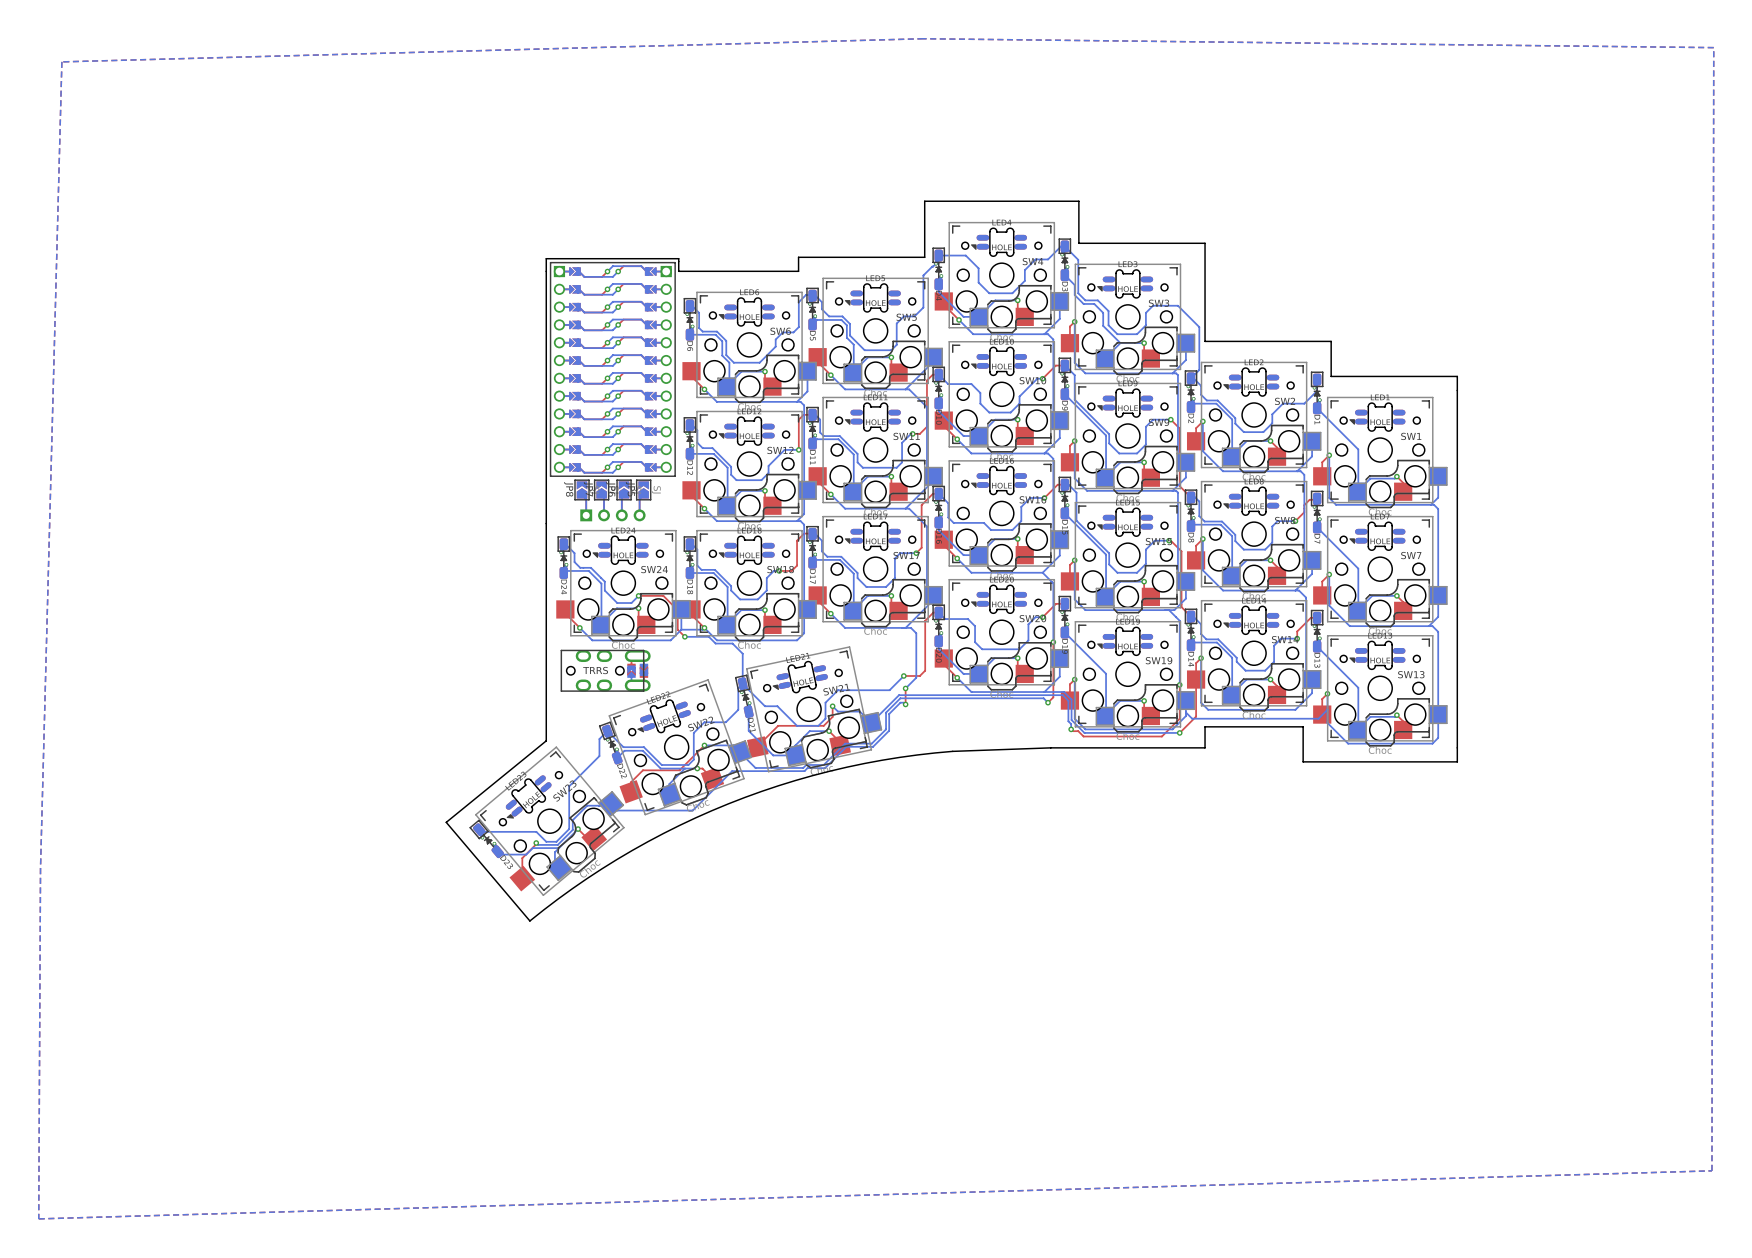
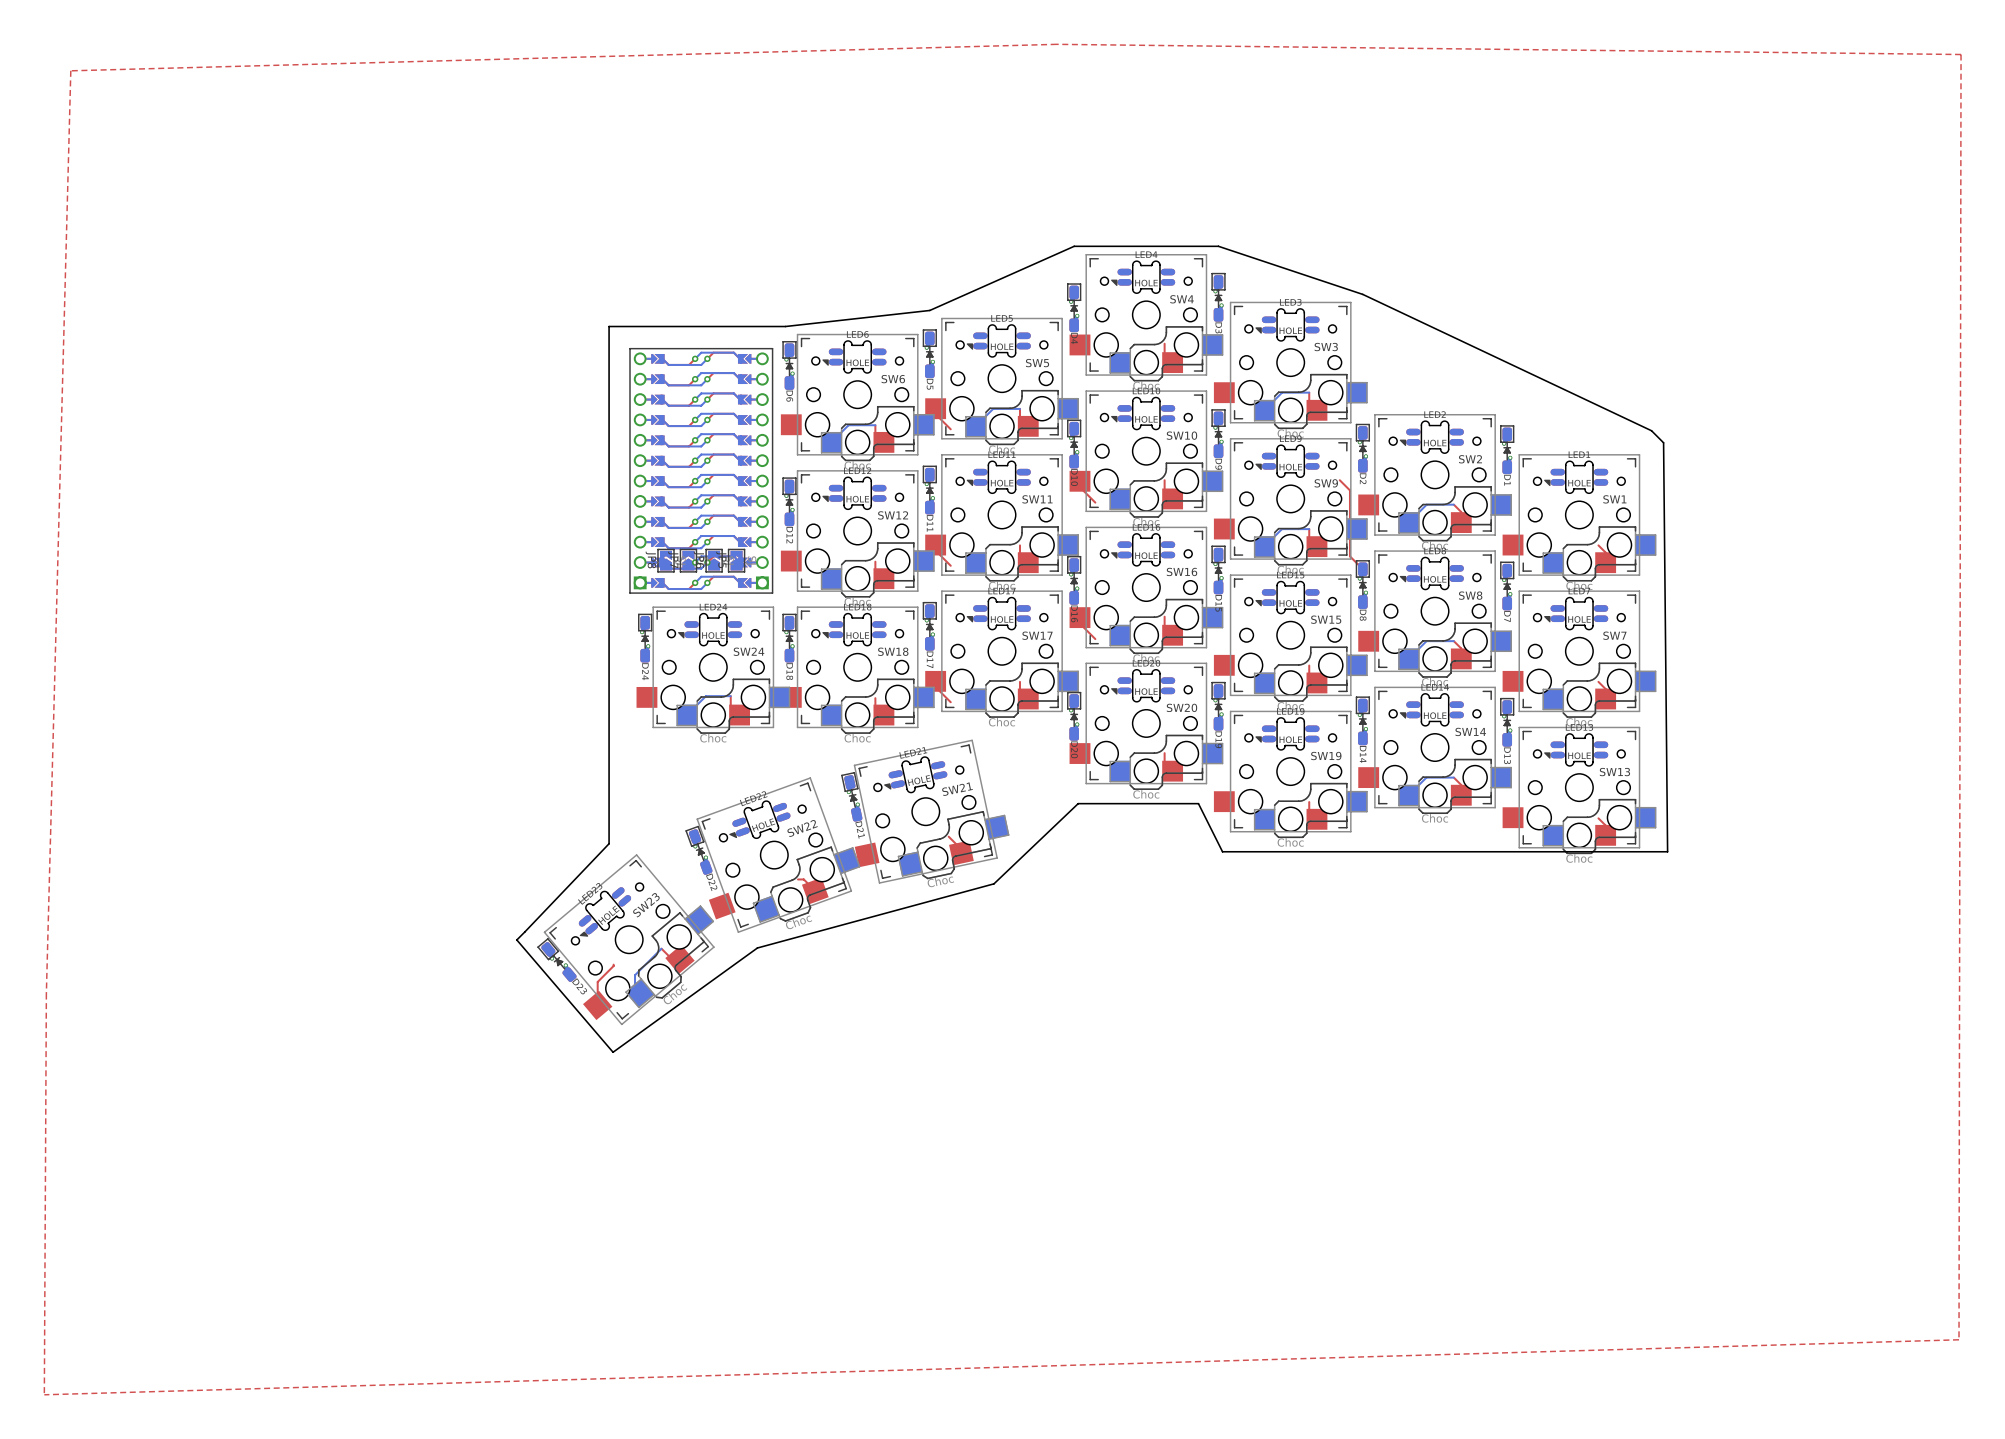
bottom zone outline: (923, 38) (1713, 47) (1711, 1170) (38, 1218) (40, 868) (61, 61) (923, 38) -> none
board edge: (1078, 201) (924, 201) (924, 257) (798, 257) (798, 271) (678, 271) (678, 258) (546, 258) (546, 740) (446, 822) (529, 920) (572, 888) (617, 859) (695, 817) (744, 797) (795, 780) (882, 760) (952, 751) (1050, 747) (1205, 747) (1205, 726) (1303, 726) (1303, 761) (1457, 761) (1457, 376) (1331, 376) (1331, 341) (1205, 341) (1205, 243) (1078, 243) (1078, 201) -> (1218, 246) (1362, 294) (1651, 430) (1663, 442) (1667, 851) (1222, 851) (1198, 803) (1078, 803) (993, 883) (757, 948) (613, 1052) (516, 939) (609, 843) (609, 326) (785, 326) (929, 310) (1074, 246) (1218, 246)
bottom track: (938, 255) (965, 255) (978, 268) (978, 282) (989, 293) (1012, 293) (1024, 280) (1024, 270) (1035, 259) (1048, 259) (1061, 246) (1064, 246) (1078, 259) (1078, 293) (1085, 300) (1097, 300) (1108, 311) (1108, 325) (1117, 334) (1137, 334) (1145, 325) (1145, 312) (1153, 305) (1177, 305) (1199, 327) (1199, 370) (1191, 378) (1193, 378) (1201, 385) (1201, 394) (1206, 400) (1217, 400) (1235, 418) (1235, 423) (1243, 432) (1263, 432) (1272, 423) (1272, 414) (1282, 403) (1304, 403) (1317, 390) (1317, 379) -> none
bottom track: (936, 263) (923, 275) (923, 307) (914, 316) (903, 316) (896, 323) (896, 344) (891, 350) (864, 350) (850, 335) (850, 324) (842, 316) (829, 316) (821, 309) (821, 302) (815, 295) (805, 295) (798, 302) (798, 327) (793, 332) (782, 332) (775, 339) (775, 346) (759, 362) (733, 362) (726, 355) (726, 340) (716, 331) (702, 331) (699, 328) (699, 312) (689, 306) -> none
bottom track: (1064, 275) (1074, 285) (1074, 295) (1083, 303) (1094, 303) (1103, 312) (1103, 325) (1120, 343) -> none
bottom track: (938, 284) (938, 292) (963, 316) (978, 316) (995, 300) (1017, 300) -> none
via: (1017, 300) -> none
top track: (943, 301) (943, 304) (959, 319) -> none
bottom track: (1059, 301) (1059, 318) (1044, 334) -> none
bottom track: (959, 319) (973, 334) (1048, 334) (1053, 339) (1053, 414) (1059, 420) (1059, 438) (1044, 453) -> none
via: (959, 319) -> none
bottom track: (1074, 321) (1074, 362) (1085, 373) (1176, 373) (1177, 375) (1177, 454) (1185, 462) (1185, 477) (1172, 490) -> none
top track: (1074, 321) (1069, 326) (1069, 343) -> none
via: (1074, 321) -> none
bottom track: (812, 324) (817, 319) (841, 319) (846, 325) (846, 337) (853, 344) (853, 371) -> none
bottom track: (689, 334) (715, 334) (722, 341) (722, 355) (729, 362) (729, 383) -> none
via: (1144, 343) -> none
bottom track: (1185, 343) (1185, 360) (1172, 373) -> none
via: (891, 357) -> none
bottom track: (933, 357) (933, 361) (905, 389) -> none
bottom track: (1064, 365) (1074, 375) (1074, 399) (1109, 434) (1109, 443) (1119, 453) (1137, 453) (1145, 444) (1145, 426) (1153, 419) (1170, 419) -> none
top track: (1064, 365) (1055, 365) (1042, 378) -> none
part rotation: 0° (612, 369) -> 180° (701, 470)
top track: (691, 371) (691, 376) (704, 389) -> none
via: (764, 371) -> none
bottom track: (807, 371) (807, 391) (797, 401) -> none
bottom track: (938, 374) (948, 384) (971, 384) (980, 392) (980, 403) (989, 412) (1010, 412) (1019, 403) (1019, 396) (1037, 378) (1042, 378) -> none
top track: (938, 374) (932, 374) (926, 380) (926, 426) (919, 433) (912, 433) -> none
bottom track: (830, 375) (845, 389) (909, 389) (926, 407) (926, 469) (933, 476) (933, 480) (905, 508) -> none
via: (830, 375) -> none
via: (1042, 378) -> none
bottom track: (704, 389) (716, 401) (800, 401) (804, 405) (804, 486) -> none
via: (704, 389) -> none
bottom track: (1064, 394) (1106, 435) (1106, 476) -> none
bottom track: (938, 403) (938, 411) (963, 436) (978, 436) (995, 419) (1017, 419) -> none
bottom track: (1191, 407) (1194, 403) (1216, 403) (1232, 419) (1232, 455) -> none
bottom track: (1317, 408) (1358, 449) (1358, 490) -> none
bottom track: (812, 414) (820, 419) (820, 432) (823, 436) (839, 436) (857, 453) (857, 462) (862, 467) (896, 467) (902, 462) (902, 442) (912, 433) -> none
top track: (812, 414) (803, 414) (798, 419) (798, 449) -> none
via: (1017, 419) -> none
via: (1170, 419) -> none
bottom track: (1202, 421) (1202, 451) (1222, 471) (1300, 471) (1304, 474) (1304, 552) (1312, 560) (1312, 573) (1295, 590) -> none
top track: (1202, 421) (1196, 428) (1196, 441) -> none
via: (1202, 421) -> none
bottom track: (689, 425) (697, 430) (697, 442) (702, 448) (712, 448) (731, 466) (731, 474) (736, 480) (761, 480) (768, 473) (768, 465) (784, 449) (798, 449) -> none
via: (912, 433) -> none
bottom track: (957, 439) (971, 453) (1048, 453) (1053, 458) (1053, 533) (1059, 539) (1059, 555) (1042, 572) -> none
via: (957, 439) -> none
bottom track: (1074, 441) (1074, 478) (1087, 490) (1176, 490) (1177, 492) (1177, 573) (1185, 581) (1185, 598) (1174, 610) (1085, 610) (1074, 599) (1074, 560) -> none
top track: (1074, 441) (1069, 445) (1069, 462) -> none
via: (1074, 441) -> none
via: (1270, 441) -> none
bottom track: (1312, 441) (1312, 456) (1297, 471) -> none
bottom track: (812, 443) (816, 439) (838, 439) (853, 454) (853, 490) -> none
via: (798, 449) -> none
bottom track: (689, 453) (713, 453) (727, 467) (727, 504) -> none
bottom track: (1329, 455) (1329, 497) (1336, 504) (1434, 504) (1438, 509) (1438, 616) (1428, 626) -> none
top track: (1329, 455) (1322, 462) (1322, 476) -> none
via: (1329, 455) -> none
via: (1144, 462) -> none
bottom track: (891, 476) (867, 476) (852, 491) -> none
via: (891, 476) -> none
bottom track: (1396, 476) (1394, 478) (1370, 478) (1357, 491) -> none
via: (1396, 476) -> none
bottom track: (1438, 476) (1438, 497) (1430, 504) -> none
bottom track: (800, 483) (807, 490) (804, 493) (804, 514) (797, 521) -> none
bottom track: (1064, 484) (1068, 484) (1076, 492) (1076, 520) (1109, 553) (1109, 564) (1117, 572) (1137, 572) (1145, 563) (1145, 549) (1154, 540) (1169, 540) -> none
top track: (1064, 484) (1057, 484) (1044, 497) -> none
top track: (691, 490) (691, 495) (704, 508) -> none
bottom track: (764, 490) (741, 490) (726, 505) -> none
via: (764, 490) -> none
bottom track: (938, 493) (948, 503) (948, 517) (953, 522) (983, 522) (991, 530) (1012, 530) (1021, 521) (1021, 506) (1030, 497) (1044, 497) -> none
top track: (938, 493) (932, 493) (921, 505) (921, 547) (916, 553) -> none
bottom track: (830, 494) (845, 508) (909, 508) (926, 526) (926, 588) (933, 595) (933, 599) (905, 627) -> none
via: (830, 494) -> none
bottom track: (582, 495) (586, 499) (586, 515) -> none
bottom track: (601, 495) (604, 497) (604, 515) -> none
bottom track: (624, 495) (621, 497) (621, 515) -> none
bottom track: (643, 495) (639, 499) (639, 515) -> none
via: (1044, 497) -> none
bottom track: (1191, 497) (1195, 497) (1199, 501) (1199, 516) (1204, 521) (1221, 521) (1235, 534) (1235, 541) (1243, 549) (1265, 549) (1272, 542) (1272, 526) (1277, 521) (1295, 521) -> none
top track: (1317, 498) (1309, 499) (1304, 505) (1304, 512) (1295, 521) -> none
bottom track: (704, 508) (716, 521) (800, 521) (804, 524) (804, 606) -> none
via: (704, 508) -> none
bottom track: (1064, 513) (1106, 554) (1106, 595) -> none
part: (612, 515) -> none
via: (1295, 521) -> none
bottom track: (938, 522) (938, 530) (963, 555) (978, 555) (995, 538) (1017, 538) -> none
bottom track: (1191, 526) (1220, 524) (1232, 536) (1232, 574) -> none
bottom track: (1317, 527) (1358, 568) (1358, 609) -> none
bottom track: (812, 533) (815, 533) (821, 540) (821, 551) (827, 556) (841, 556) (857, 573) (857, 578) (866, 586) (886, 586) (894, 578) (894, 558) (900, 553) (916, 553) -> none
top track: (812, 533) (804, 533) (797, 540) (797, 565) (791, 570) (779, 570) -> none
via: (1017, 538) -> none
bottom track: (1202, 538) (1202, 570) (1223, 590) (1299, 590) (1306, 597) (1306, 673) (1312, 679) (1312, 693) (1295, 709) (1208, 709) (1201, 702) (1201, 658) -> none
top track: (1202, 538) (1196, 545) (1196, 560) -> none
via: (1202, 538) -> none
top track: (1169, 540) (1181, 551) (1181, 607) (1191, 616) -> none
via: (1169, 540) -> none
bottom track: (563, 544) (574, 553) (574, 562) (580, 567) (590, 567) (604, 581) (604, 590) (617, 603) (631, 603) (638, 595) -> none
bottom track: (689, 544) (697, 549) (697, 565) (701, 569) (714, 569) (731, 586) (731, 590) (740, 599) (757, 599) (766, 590) (766, 578) (773, 570) (779, 570) -> none
via: (916, 553) -> none
bottom track: (957, 558) (971, 572) (1042, 572) -> none
via: (957, 558) -> none
top track: (1074, 560) (1069, 565) (1069, 581) -> none
via: (1074, 560) -> none
via: (1270, 560) -> none
bottom track: (812, 562) (815, 559) (840, 559) (853, 573) (853, 609) -> none
via: (779, 570) -> none
bottom track: (1042, 572) (1053, 583) (1053, 642) -> none
bottom track: (563, 573) (565, 570) (588, 570) (601, 583) (601, 623) -> none
bottom track: (689, 573) (713, 573) (727, 586) (727, 623) -> none
bottom track: (1329, 574) (1329, 605) (1349, 626) (1432, 626) (1438, 631) (1438, 737) (1432, 743) (1348, 743) (1327, 722) (1327, 693) -> none
top track: (1329, 574) (1322, 581) (1322, 595) -> none
via: (1329, 574) -> none
bottom track: (1144, 581) (1120, 581) (1104, 596) -> none
via: (1144, 581) -> none
top track: (638, 595) (663, 595) (677, 610) (677, 629) (684, 636) -> none
via: (638, 595) -> none
bottom track: (891, 595) (867, 595) (852, 610) -> none
via: (891, 595) -> none
bottom track: (1396, 595) (1372, 595) (1357, 610) -> none
via: (1396, 595) -> none
bottom track: (800, 602) (807, 609) (804, 612) (804, 633) (797, 640) (716, 640) (704, 627) (702, 629) (681, 629) -> none
top track: (1064, 603) (1056, 603) (1042, 617) -> none
via: (638, 608) -> none
top track: (565, 609) (565, 613) (579, 627) -> none
bottom track: (681, 609) (681, 629) -> none
top track: (691, 609) (691, 614) (704, 627) -> none
bottom track: (764, 610) (741, 610) (726, 624) -> none
via: (764, 610) -> none
bottom track: (1169, 610) (1179, 620) (1179, 684) -> none
bottom track: (938, 612) (945, 619) (967, 619) (975, 626) (975, 642) (982, 649) (1019, 649) (1028, 640) (1028, 624) (1035, 617) (1042, 617) -> none
top track: (938, 612) (933, 612) (925, 620) (925, 670) (919, 675) (903, 675) -> none
bottom track: (830, 613) (845, 627) (910, 627) (916, 633) (916, 677) (905, 688) -> none
via: (830, 613) -> none
bottom track: (1191, 616) (1201, 624) (1201, 634) (1206, 639) (1218, 639) (1236, 657) (1236, 661) (1245, 670) (1265, 670) (1274, 661) (1274, 645) (1281, 638) (1297, 638) -> none
via: (1042, 617) -> none
top track: (1317, 617) (1310, 617) (1297, 631) (1297, 638) -> none
bottom track: (579, 627) (592, 640) (670, 640) (681, 629) -> none
via: (579, 627) -> none
via: (704, 627) -> none
bottom track: (1064, 632) (1106, 673) (1106, 714) -> none
bottom track: (684, 636) (708, 636) (715, 643) (732, 643) (742, 653) (742, 683) (764, 706) (777, 706) (797, 725) (818, 725) (825, 718) (825, 702) (837, 690) (889, 690) (903, 675) -> none
via: (684, 636) -> none
via: (1297, 638) -> none
bottom track: (938, 641) (938, 649) (963, 673) (978, 673) (994, 658) (1017, 658) -> none
top track: (1053, 642) (1053, 697) (1048, 702) -> none
via: (1053, 642) -> none
bottom track: (1191, 645) (1193, 642) (1216, 642) (1232, 657) (1232, 693) -> none
bottom track: (1317, 646) (1358, 687) (1358, 728) -> none
top track: (943, 658) (943, 664) (957, 677) -> none
via: (1017, 658) -> none
bottom track: (1059, 658) (1059, 676) (1044, 692) -> none
top track: (1201, 658) (1196, 663) (1196, 716) (1179, 732) -> none
via: (1201, 658) -> none
part: (605, 670) -> none
via: (903, 675) -> none
bottom track: (957, 677) (971, 692) (1064, 692) (1071, 699) (1071, 720) (1084, 732) (1179, 732) -> none
via: (957, 677) -> none
bottom track: (1074, 679) (1074, 718) (1085, 729) (1172, 729) (1185, 716) (1185, 700) -> none
top track: (1074, 679) (1069, 684) (1069, 700) -> none
via: (1074, 679) -> none
via: (1270, 679) -> none
bottom track: (742, 683) (738, 688) (738, 709) (725, 722) (704, 722) (693, 732) (693, 759) (688, 764) (661, 764) (643, 747) (623, 747) (607, 731) (599, 739) (599, 756) (569, 786) (569, 829) (556, 841) (546, 841) (536, 831) (481, 831) -> none
top track: (1179, 684) (1179, 718) (1161, 736) (1083, 736) (1078, 731) (1072, 731) -> none
via: (1179, 684) -> none
top track: (905, 688) (905, 704) -> none
via: (905, 688) -> none
top track: (1327, 693) (1322, 699) (1322, 714) -> none
via: (1327, 693) -> none
bottom track: (1144, 700) (1120, 700) (1104, 715) -> none
via: (1144, 700) -> none
bottom track: (1048, 702) (1043, 698) (900, 698) (886, 712) (886, 729) (871, 743) (845, 743) (823, 764) (806, 764) (803, 767) (755, 767) (733, 745) (704, 745) -> none
via: (1048, 702) -> none
bottom track: (905, 704) (900, 702) (889, 713) (889, 730) (873, 746) (846, 746) (825, 768) (807, 768) (804, 771) (732, 771) (692, 810) (617, 810) (611, 804) (609, 805) (587, 805) (572, 820) (572, 829) (557, 844) (538, 844) (536, 843) -> none
via: (905, 704) -> none
bottom track: (832, 706) (837, 711) (859, 711) (871, 722) (899, 695) (1062, 695) (1068, 700) (1068, 721) (1071, 724) (1071, 729) -> none
top track: (832, 706) (832, 716) (823, 725) (778, 725) (757, 747) -> none
via: (832, 706) -> none
bottom track: (1327, 709) (1318, 718) (1192, 718) (1186, 712) -> none
bottom track: (748, 711) (748, 730) (773, 755) (794, 755) (795, 745) (809, 731) (829, 731) -> none
bottom track: (1396, 715) (1395, 716) (1370, 716) (1357, 729) -> none
via: (1396, 715) -> none
via: (1071, 729) -> none
via: (829, 731) -> none
via: (1179, 732) -> none
top track: (704, 745) (679, 770) (642, 770) (631, 782) (631, 791) -> none
via: (704, 745) -> none
bottom track: (617, 758) (624, 750) (642, 750) (660, 768) (697, 768) -> none
bottom track: (684, 768) (669, 784) (669, 794) -> none
via: (697, 768) -> none
via: (578, 829) -> none
via: (536, 843) -> none
bottom track: (559, 848) (532, 848) (526, 854) (500, 854) (497, 851) -> none

